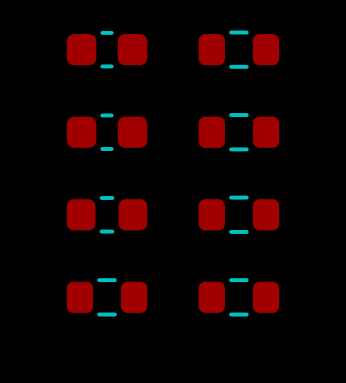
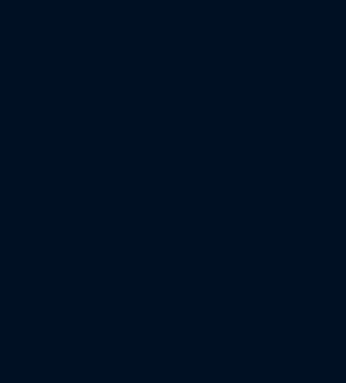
part: (107, 49) -> none
part: (238, 49) -> none
part: (107, 132) -> none
part: (238, 132) -> none
part: (107, 214) -> none
part: (238, 214) -> none
part: (107, 297) -> none
part: (238, 297) -> none

